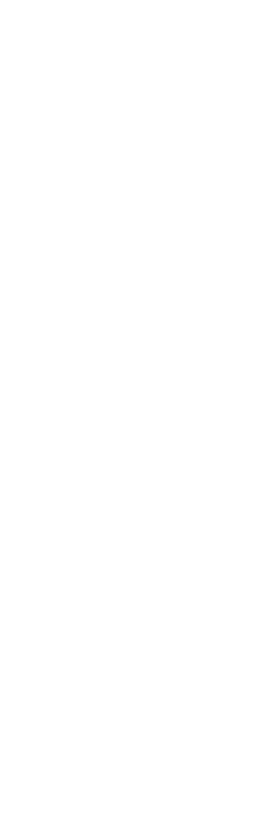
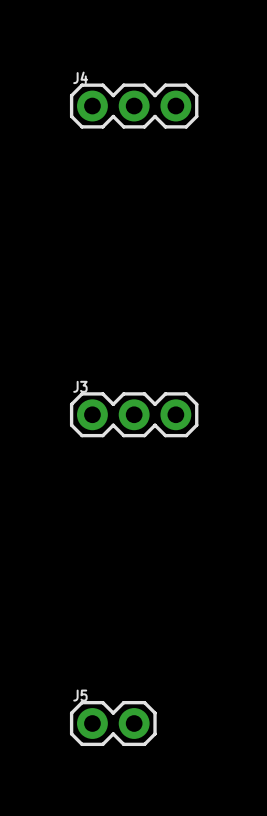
J4: none -> (134, 106)
J3: none -> (134, 414)
J5: none -> (113, 723)

